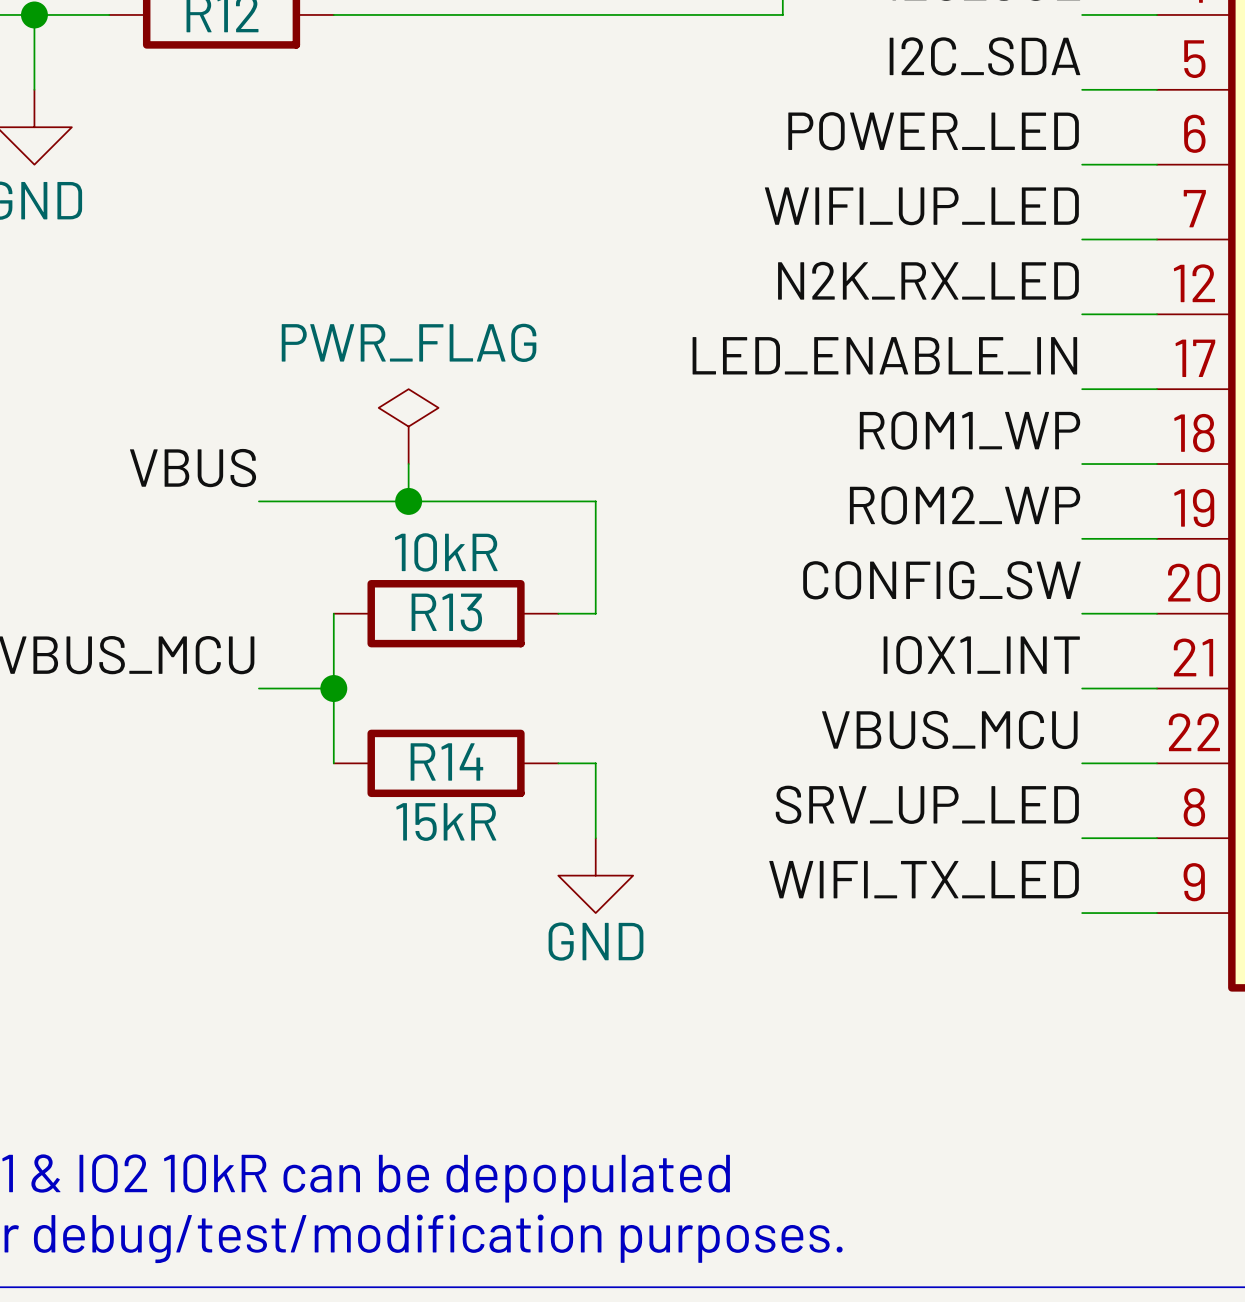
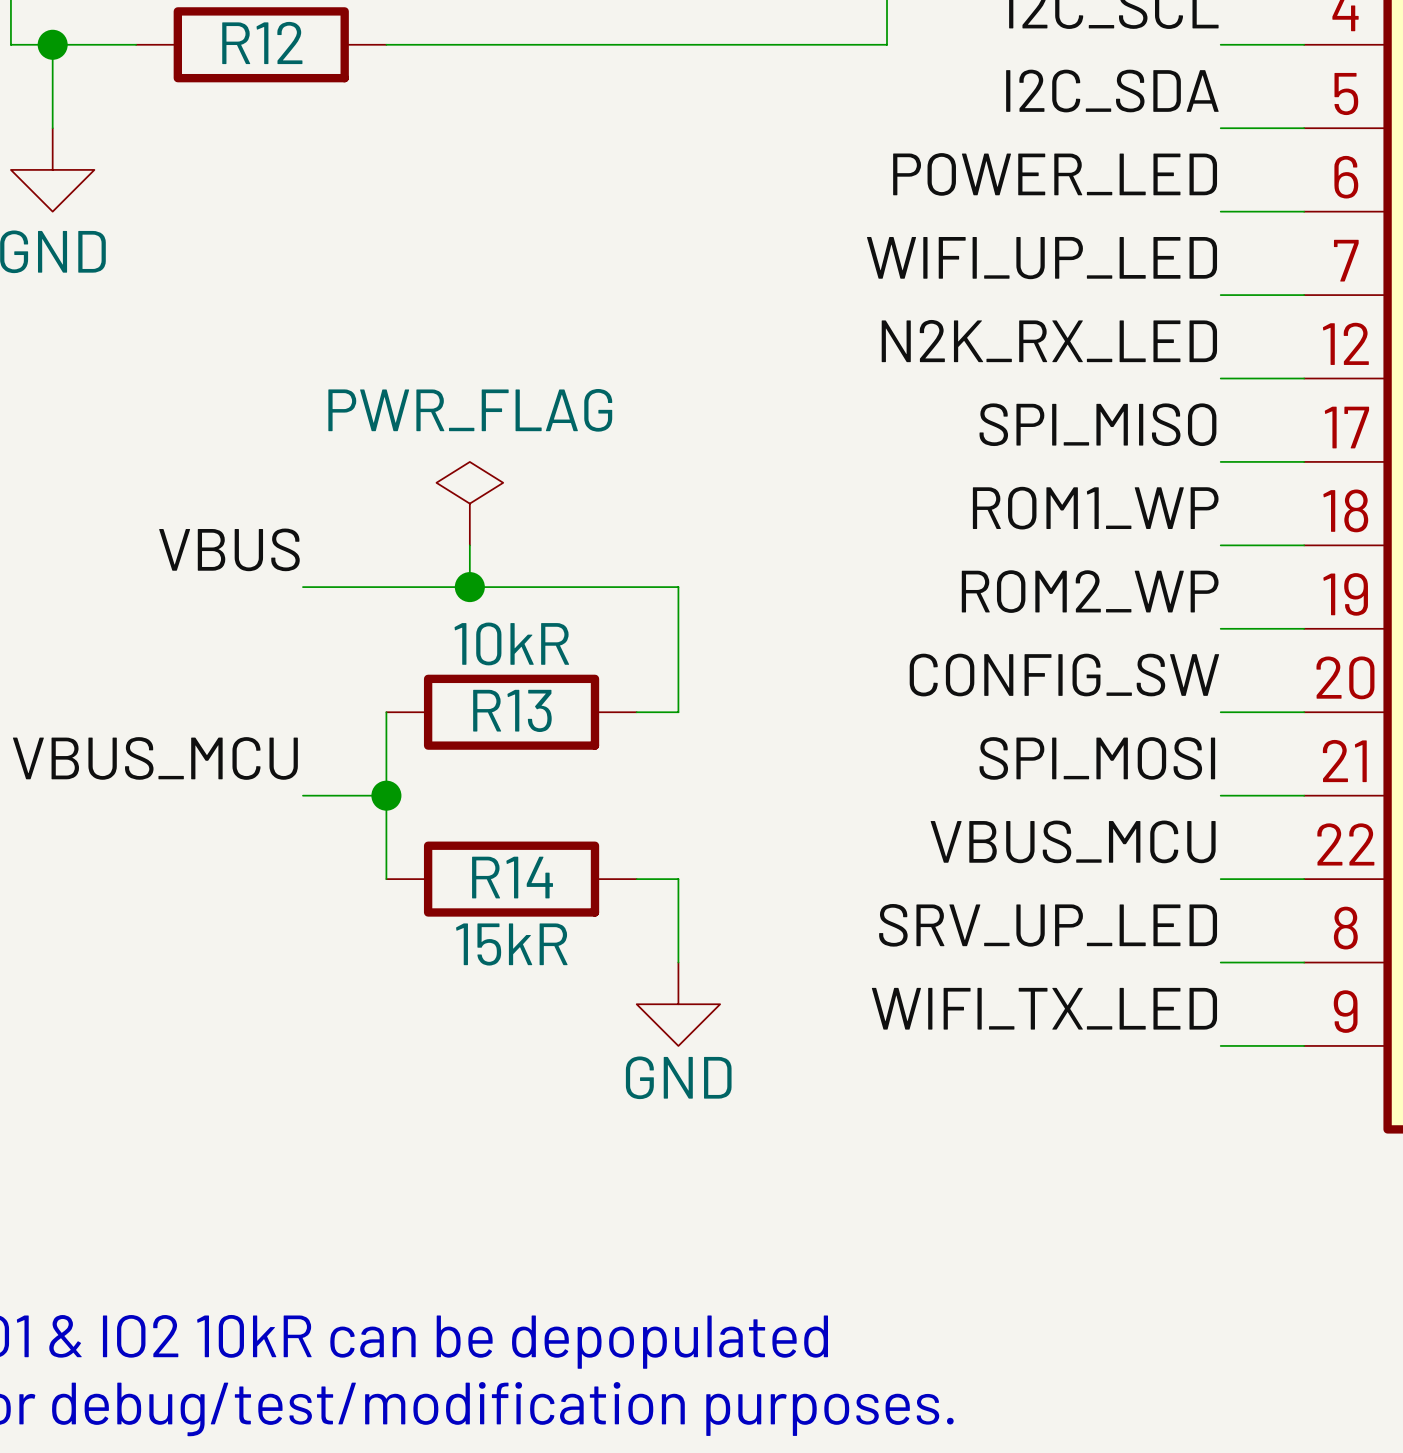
label: LED_ENABLE_IN (884, 355) -> SPI_MISO (1097, 424)
label: IOX1_INT (981, 655) -> SPI_MOSI (1097, 758)

